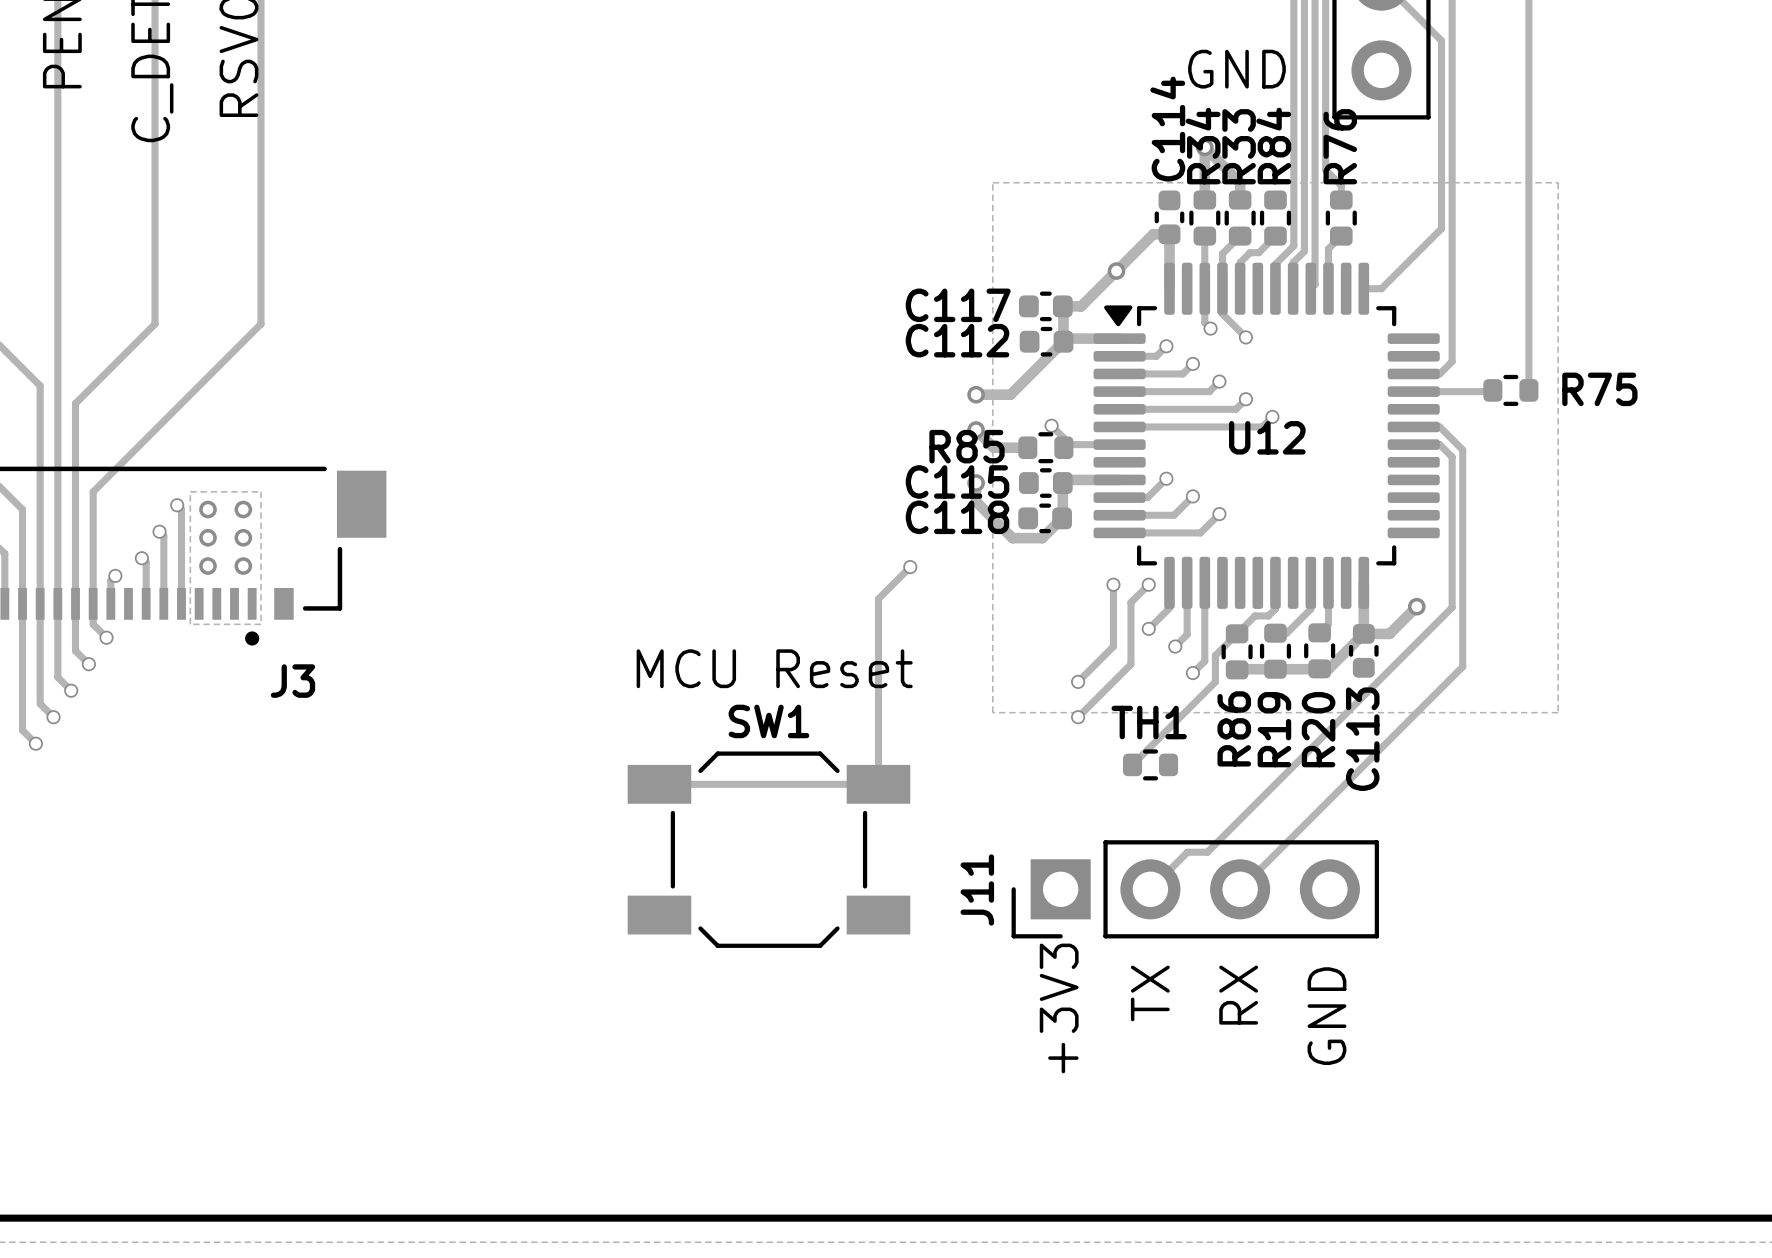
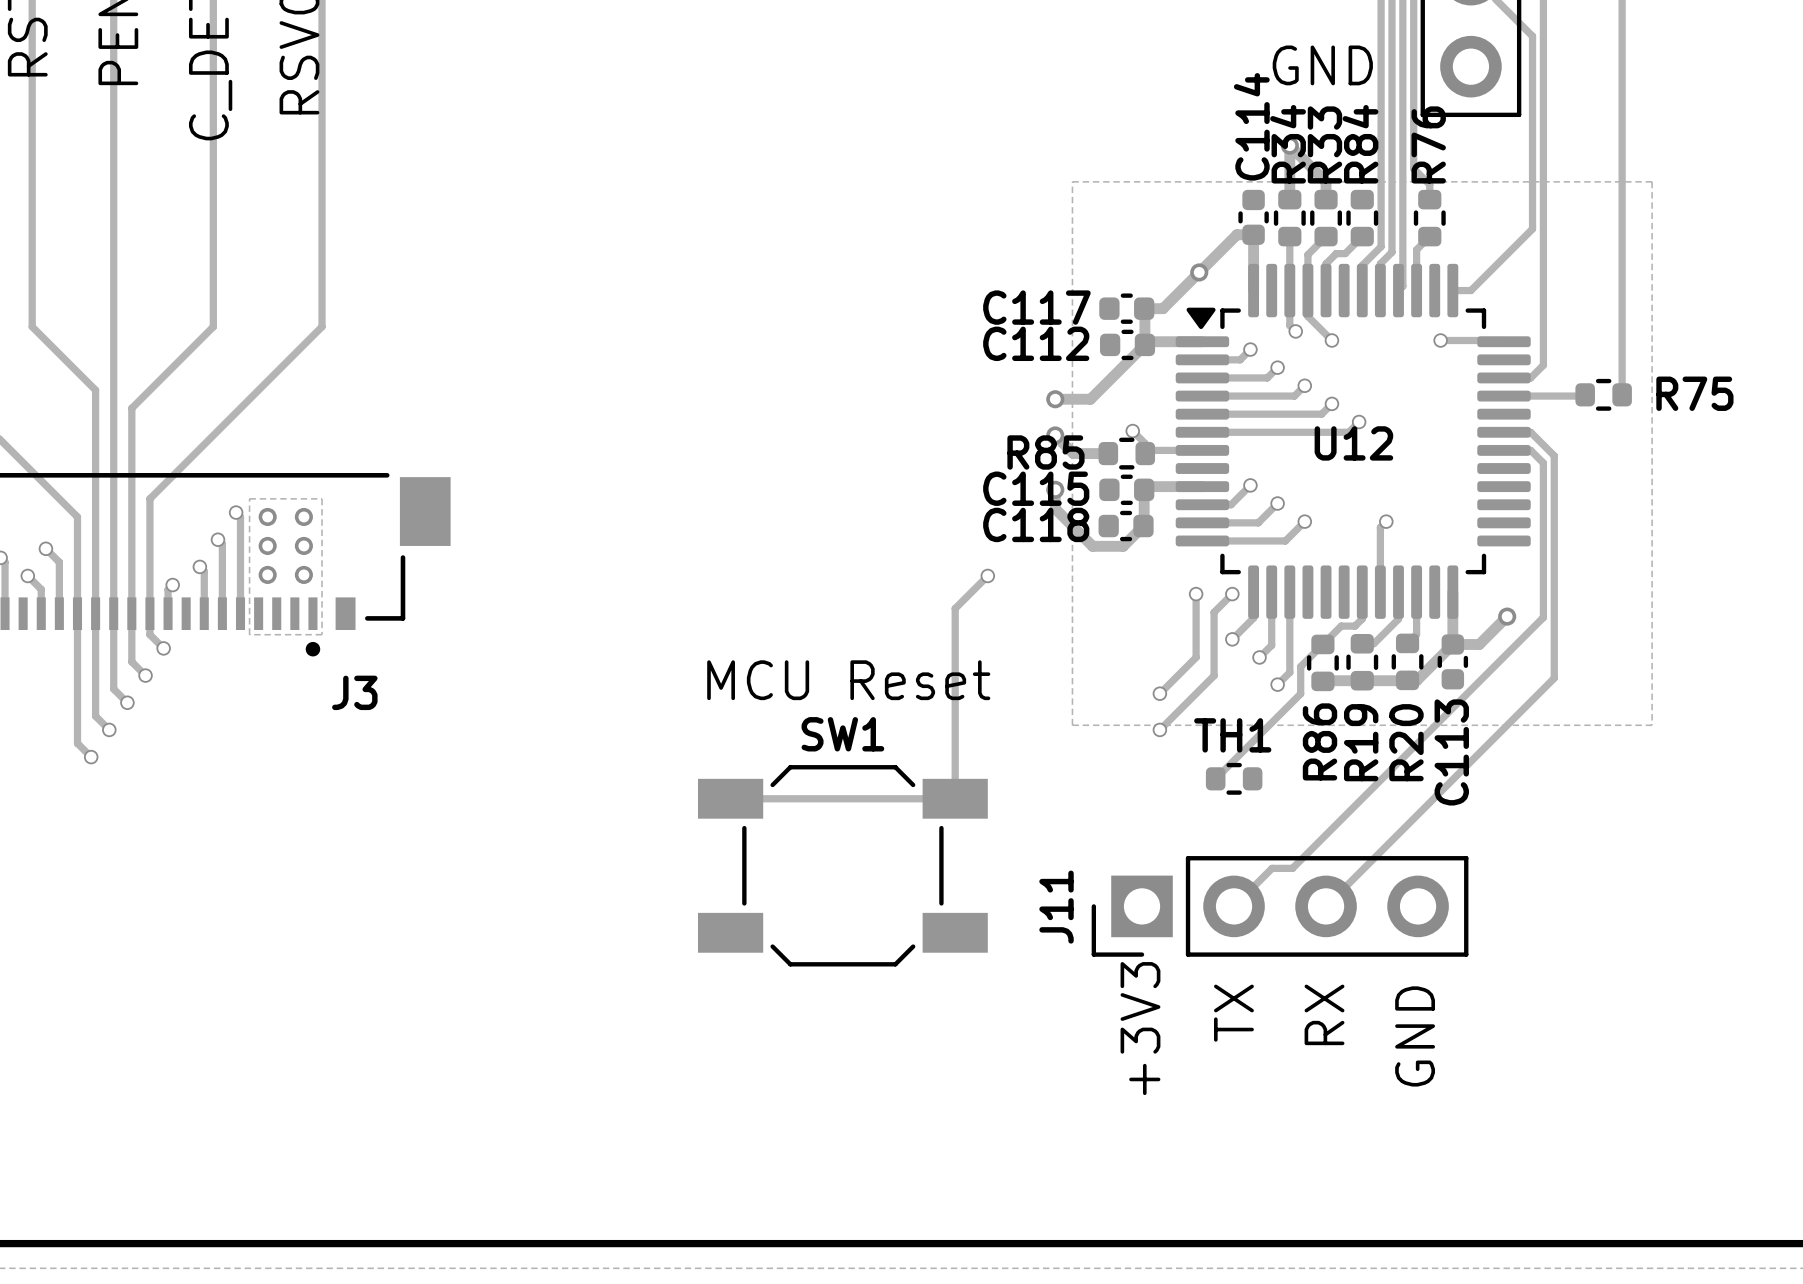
track: none -> (1440, 340) (1504, 341)
via: none -> (1440, 340)
track: none -> (1386, 521) (1380, 527) (1380, 592)
via: none -> (1386, 521)

